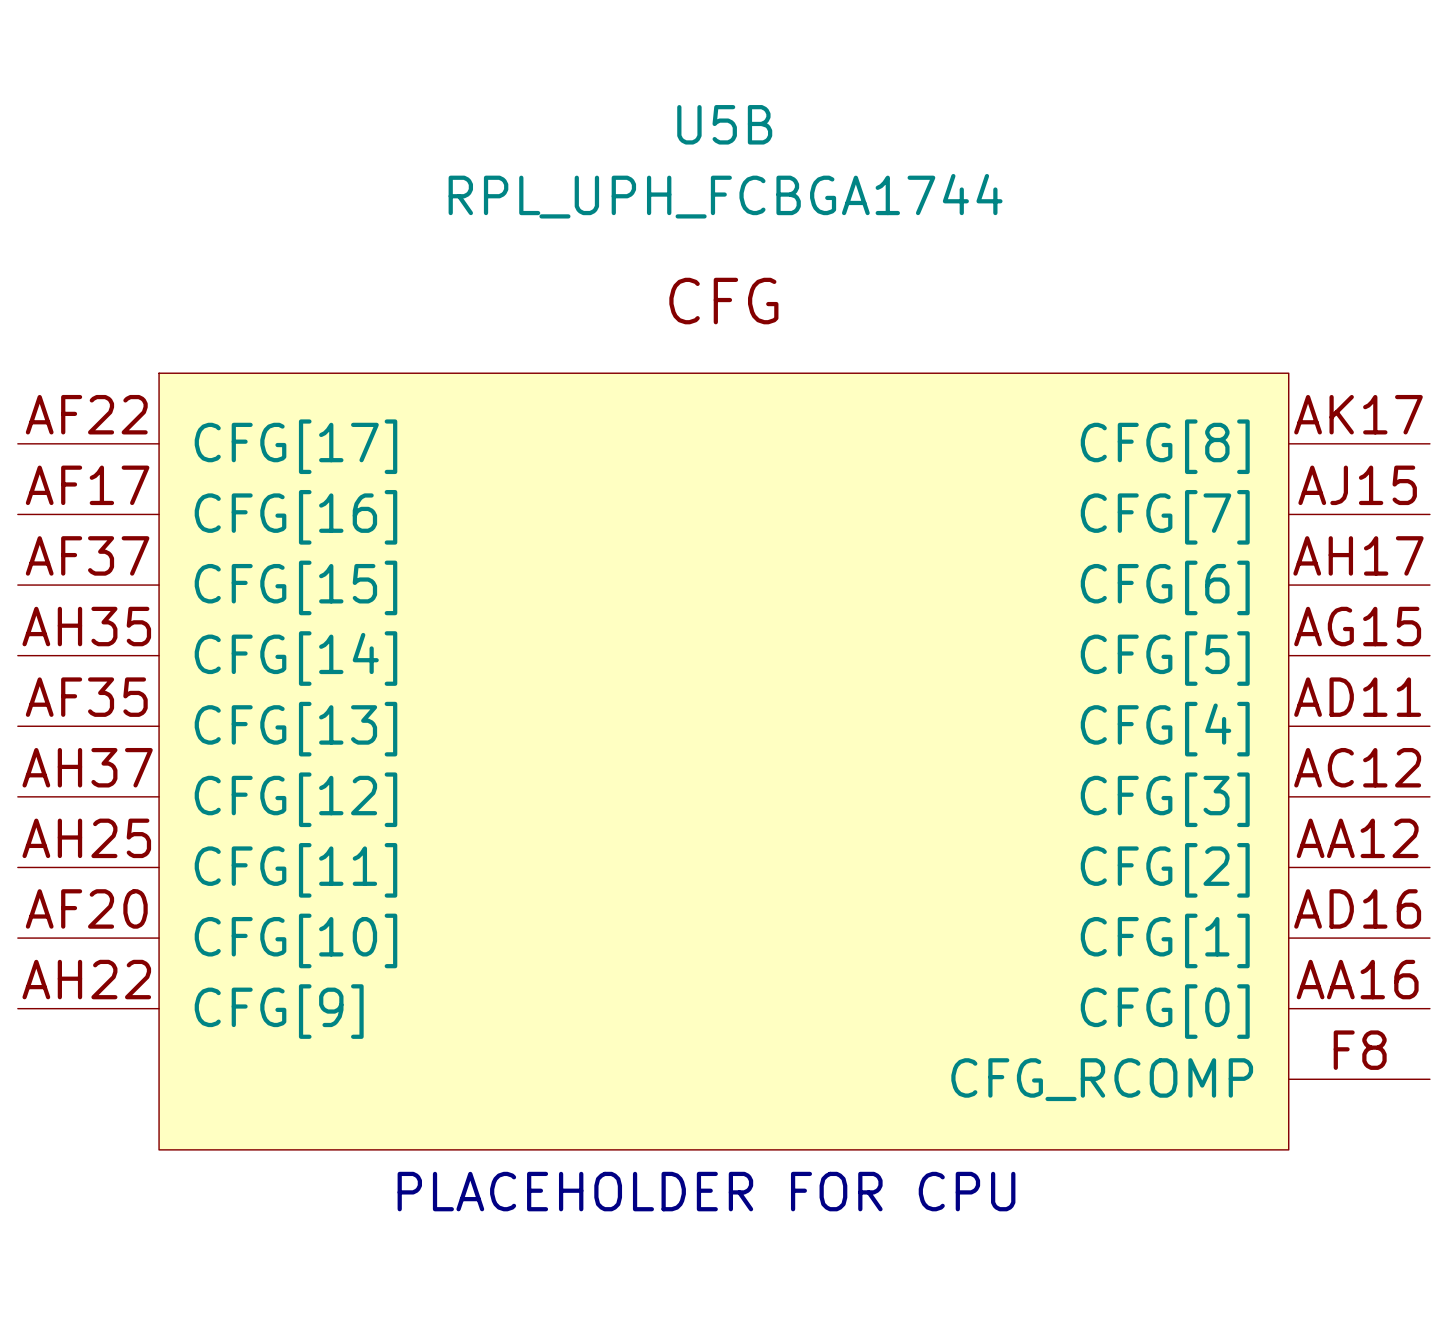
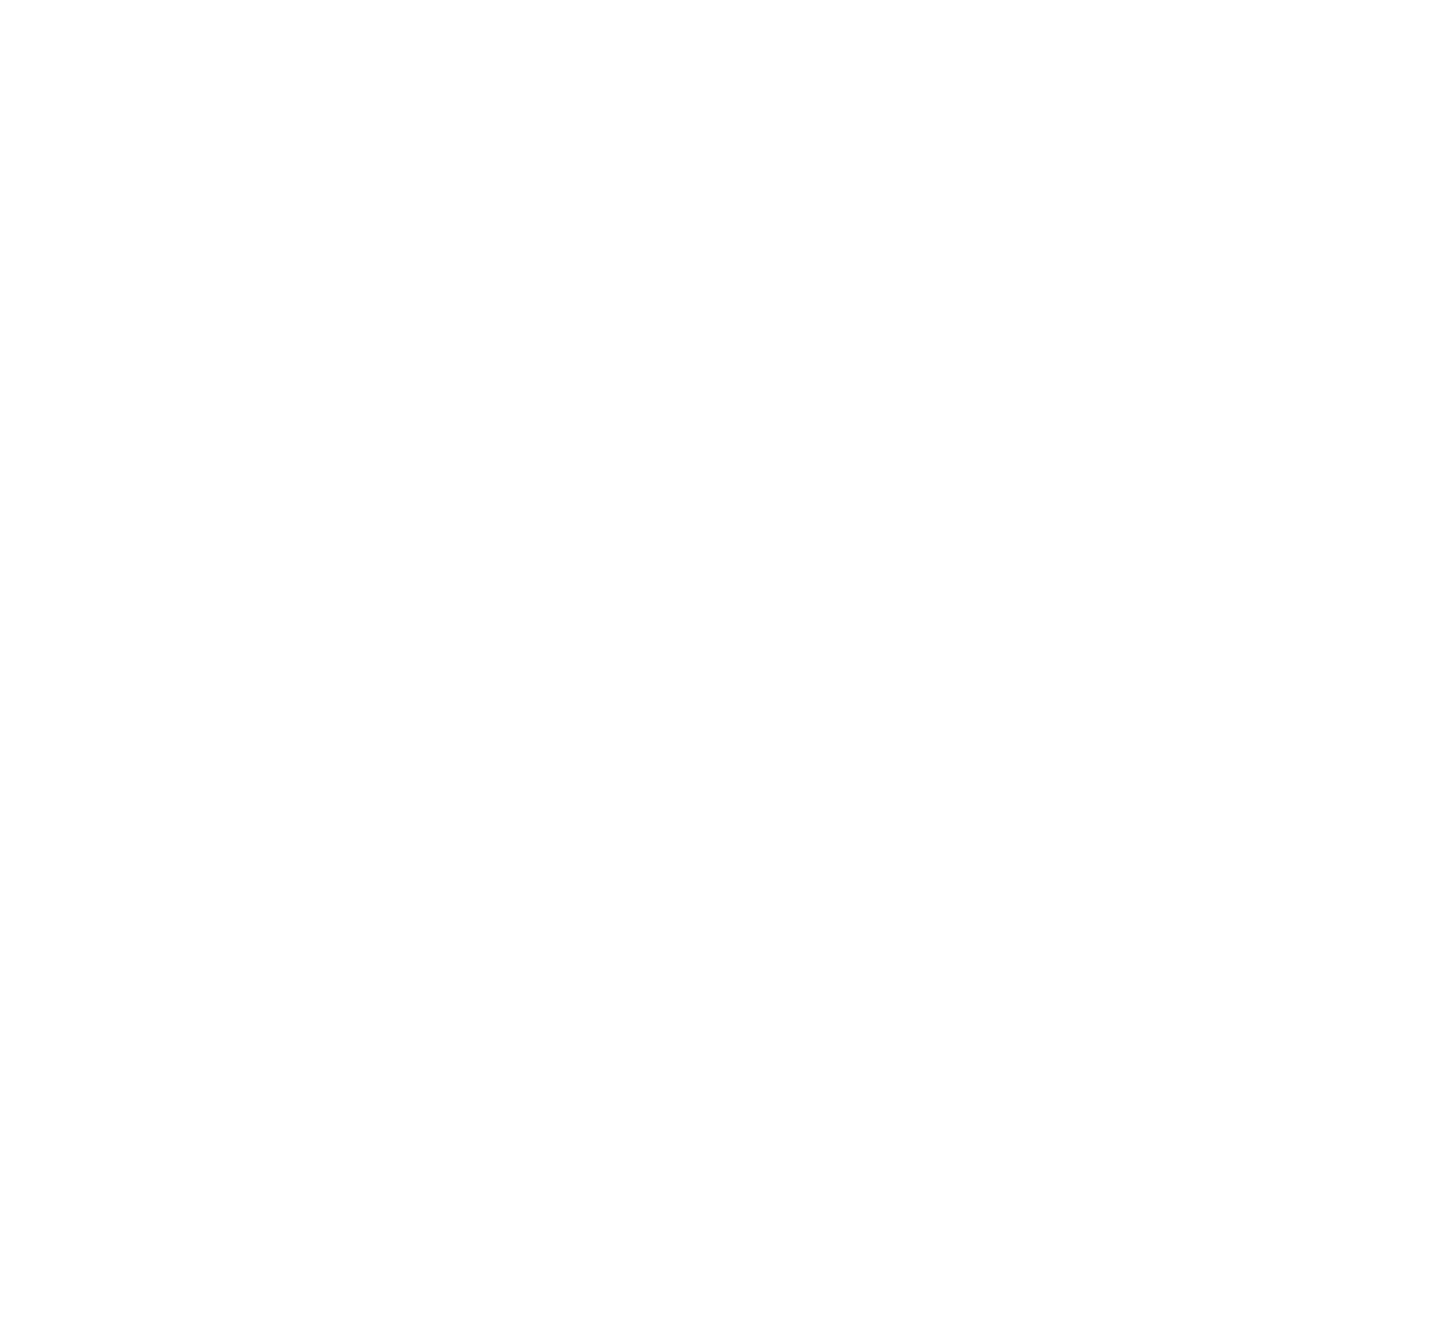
U5B: RPL_UPH_FCBGA1744 (723, 761) -> none
text: PLACEHOLDER FOR CPU (706, 1191) -> none

